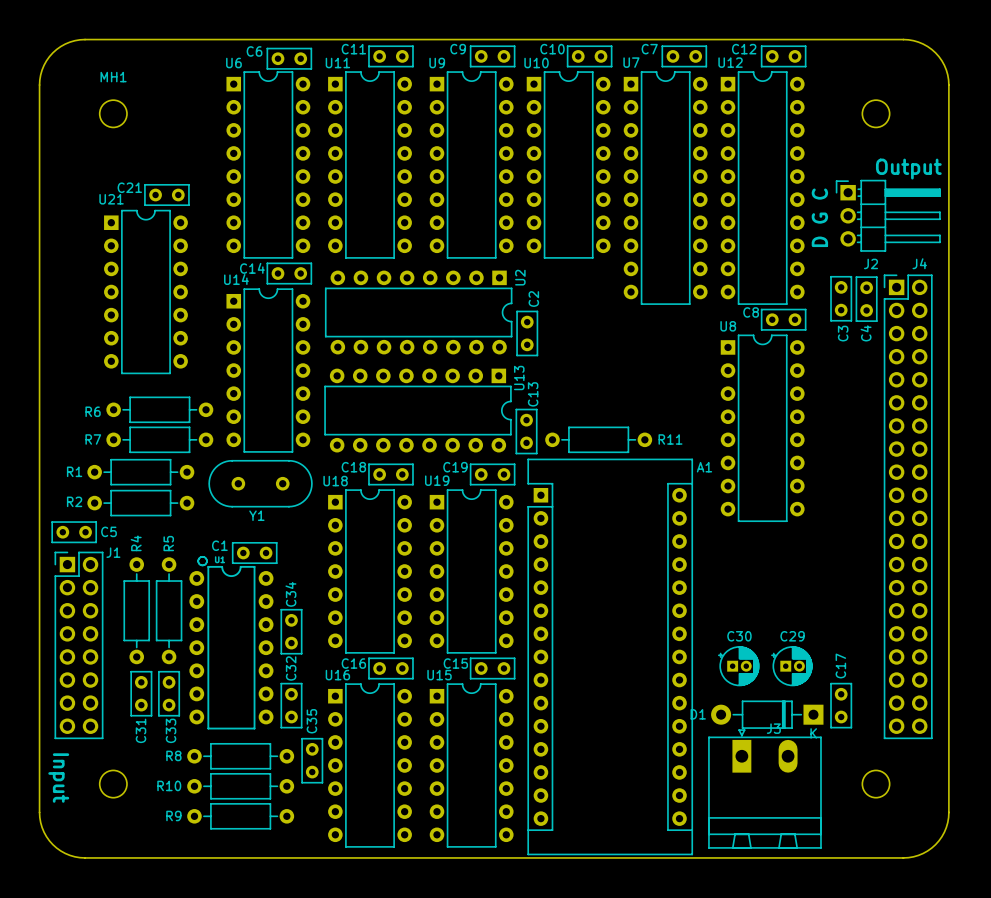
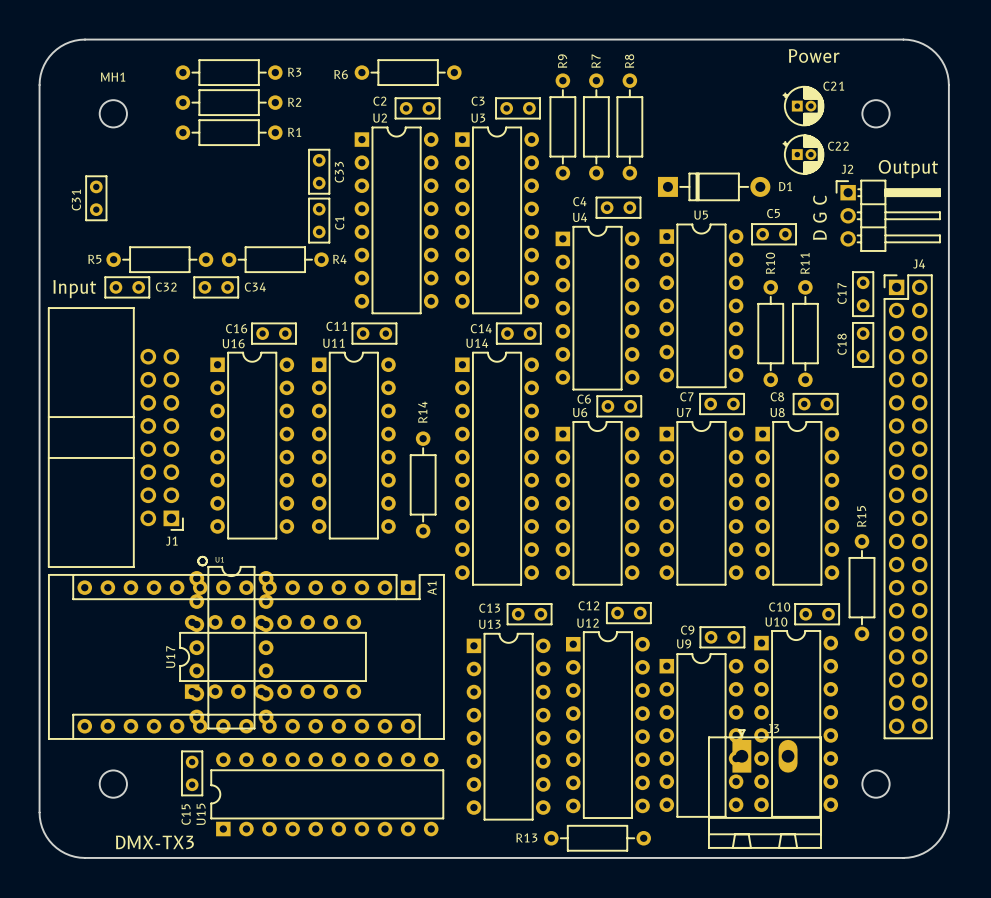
text: none -> Power (814, 56)
C11 position: (390, 56) -> (374, 333)
C9 position: (492, 56) -> (722, 637)
C10 position: (589, 56) -> (817, 614)
C7 position: (684, 56) -> (722, 404)
C12 position: (783, 56) -> (628, 613)
C6 position: (289, 58) -> (619, 406)
U7 name position: U7 (631, 62) -> U7 (683, 412)
U12 name position: U12 (730, 62) -> U12 (588, 623)
U6 name position: U6 (233, 63) -> U6 (580, 412)
U11 name position: U11 (337, 63) -> U11 (333, 343)
U9 name position: U9 (437, 63) -> U9 (684, 643)
U10 name position: U10 (536, 63) -> U10 (776, 622)
U6 footprint: [226, 71, 311, 259] -> [555, 421, 640, 586]
U9 footprint: [429, 71, 514, 259] -> [659, 653, 744, 818]
U7 footprint: [623, 71, 708, 305] -> [659, 421, 744, 586]
U12 footprint: [720, 71, 805, 305] -> [565, 631, 650, 819]
R3: none -> (229, 72)
C22: none -> (803, 154)
U11 position: (370, 164) -> (353, 445)
U10 position: (568, 164) -> (796, 723)
C21 footprint: [144, 184, 190, 206] -> [782, 86, 824, 126]
C21 name position: C21 (129, 187) -> C21 (833, 86)
U3: none -> (497, 220)
J2 name position: J2 (871, 263) -> J2 (847, 169)
C14 position: (289, 273) -> (518, 333)
U2 name position: U2 (520, 277) -> U2 (380, 118)
U14 name position: U14 (236, 279) -> U14 (477, 343)
U14 footprint: [226, 288, 311, 453] -> [455, 352, 539, 586]
text: none -> Input (74, 289)
U21: (145, 292) -> none
C3 rotation: 0° (841, 298) -> 90° clockwise (518, 108)
C3 position: (841, 298) -> (518, 108)
C2 name position: C2 (533, 299) -> C2 (379, 101)
C4 rotation: 0° (866, 299) -> 90° clockwise (618, 207)
C4 position: (866, 299) -> (618, 207)
U5: none -> (701, 305)
U4: none -> (597, 308)
U2 rotation: 0° (418, 312) -> 90° counterclockwise (396, 220)
C8 name position: C8 (751, 312) -> C8 (777, 396)
C8 position: (783, 319) -> (815, 404)
U8 name position: U8 (728, 326) -> U8 (777, 412)
C2 rotation: 0° (527, 333) -> 90° clockwise (417, 108)
C2 position: (527, 333) -> (417, 108)
U8 footprint: [720, 334, 805, 522] -> [755, 421, 840, 586]
C13 name position: C13 (533, 394) -> C13 (489, 608)
R6 position: (159, 409) -> (408, 72)
U13 rotation: 0° (417, 410) -> 90° counterclockwise (508, 726)
U13 position: (417, 410) -> (508, 726)
C13 rotation: 0° (526, 431) -> 90° clockwise (529, 614)
C13 position: (526, 431) -> (529, 614)
R7 rotation: 0° (159, 439) -> 90° clockwise (596, 126)
R7 position: (159, 439) -> (596, 126)
R11 rotation: 0° (598, 439) -> 90° clockwise (805, 333)
R11 position: (598, 439) -> (805, 333)
R11 name position: R11 (670, 439) -> R11 (805, 263)
A1 name position: A1 (704, 467) -> A1 (432, 588)
R1 name position: R1 (74, 471) -> R1 (294, 132)
R1 position: (140, 472) -> (229, 132)
C18 rotation: 0° (390, 474) -> 90° clockwise (863, 344)
C18 position: (390, 474) -> (863, 344)
C19: (492, 474) -> none
Y1: (260, 483) -> none
R14: none -> (423, 484)
R2 name position: R2 (74, 501) -> R2 (294, 102)
R2 position: (140, 503) -> (229, 102)
C5 name position: C5 (109, 531) -> C5 (773, 213)
C5 position: (74, 532) -> (774, 234)
R5 name position: R5 (168, 543) -> R5 (94, 259)
C1 name position: C1 (219, 545) -> C1 (339, 223)
J1 footprint: [54, 551, 104, 739] -> [48, 307, 184, 568]
J1 name position: J1 (113, 552) -> J1 (171, 541)
C1 rotation: 0° (254, 553) -> 90° clockwise (319, 220)
C1 position: (254, 553) -> (319, 220)
U18: (370, 571) -> none
U19: (471, 571) -> none
R15: none -> (861, 587)
R4 rotation: 0° (136, 610) -> 90° clockwise (275, 259)
R4 position: (136, 610) -> (275, 259)
R5 rotation: 0° (169, 610) -> 90° clockwise (159, 259)
R5 position: (169, 610) -> (159, 259)
C34 rotation: 0° (291, 631) -> 90° clockwise (216, 287)
C34 position: (291, 631) -> (216, 287)
U17: none -> (273, 656)
A1 rotation: 0° (610, 656) -> 90° clockwise (246, 656)
A1 position: (610, 656) -> (246, 656)
C15 name position: C15 (455, 663) -> C15 (186, 814)
C17 name position: C17 (840, 665) -> C17 (842, 293)
C30: (738, 666) -> none
C29: (791, 666) -> none
C16 position: (390, 668) -> (273, 333)
C15 rotation: 0° (492, 668) -> 90° clockwise (192, 773)
C15 position: (492, 668) -> (192, 773)
U15 name position: U15 (439, 675) -> U15 (201, 814)
U16 footprint: [328, 683, 412, 848] -> [210, 352, 295, 540]
U15 footprint: [429, 683, 514, 848] -> [210, 752, 444, 837]
C31 position: (141, 693) -> (96, 198)
C33 position: (169, 693) -> (319, 171)
D1 footprint: [711, 700, 824, 729] -> [657, 173, 771, 201]
C32 rotation: 0° (291, 705) -> 90° clockwise (127, 287)
C32 position: (291, 705) -> (127, 287)
C17 position: (841, 705) -> (863, 294)
D1 name position: D1 (698, 714) -> D1 (785, 186)
C31 name position: C31 (141, 730) -> C31 (76, 200)
C33 name position: C33 (171, 730) -> C33 (339, 172)
R8 rotation: 0° (240, 756) -> 90° clockwise (629, 126)
R8 position: (240, 756) -> (629, 126)
C35: (312, 760) -> none
text: Input (58, 778) -> none
R10 rotation: 0° (240, 786) -> 90° clockwise (770, 333)
R10 position: (240, 786) -> (770, 333)
R9 rotation: 0° (240, 816) -> 90° clockwise (562, 126)
R9 position: (240, 816) -> (562, 126)
R13: none -> (597, 838)
text: none -> DMX-TX3 (154, 842)

